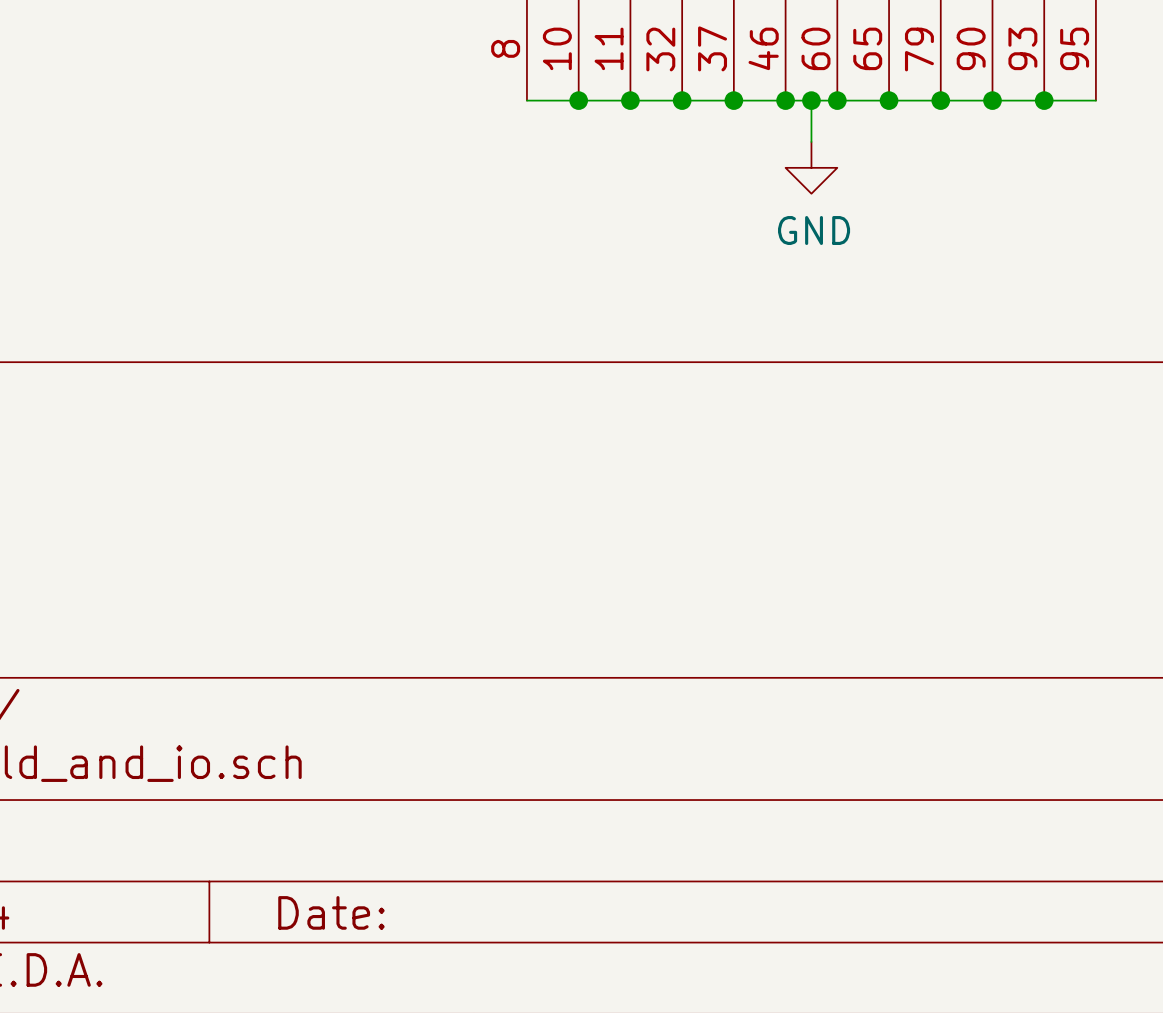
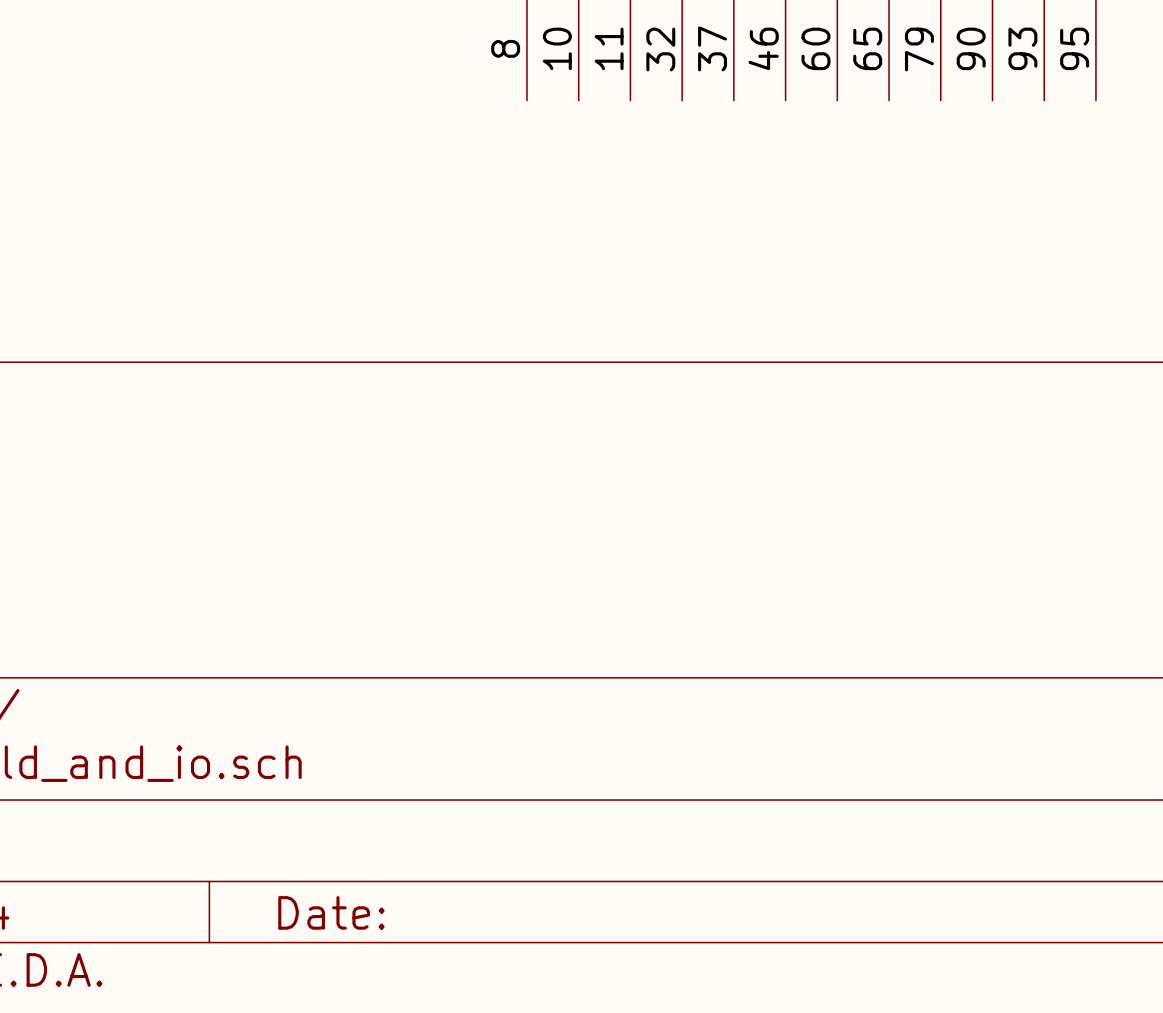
wire: (526, 100) (1095, 100) -> none
junction: (578, 100) -> none
junction: (630, 100) -> none
junction: (682, 100) -> none
junction: (733, 100) -> none
junction: (785, 100) -> none
wire: (811, 100) (811, 141) -> none
junction: (811, 100) -> none
junction: (837, 100) -> none
junction: (889, 100) -> none
junction: (940, 100) -> none
junction: (992, 100) -> none
junction: (1044, 100) -> none
power symbol: GND (811, 167) -> none

